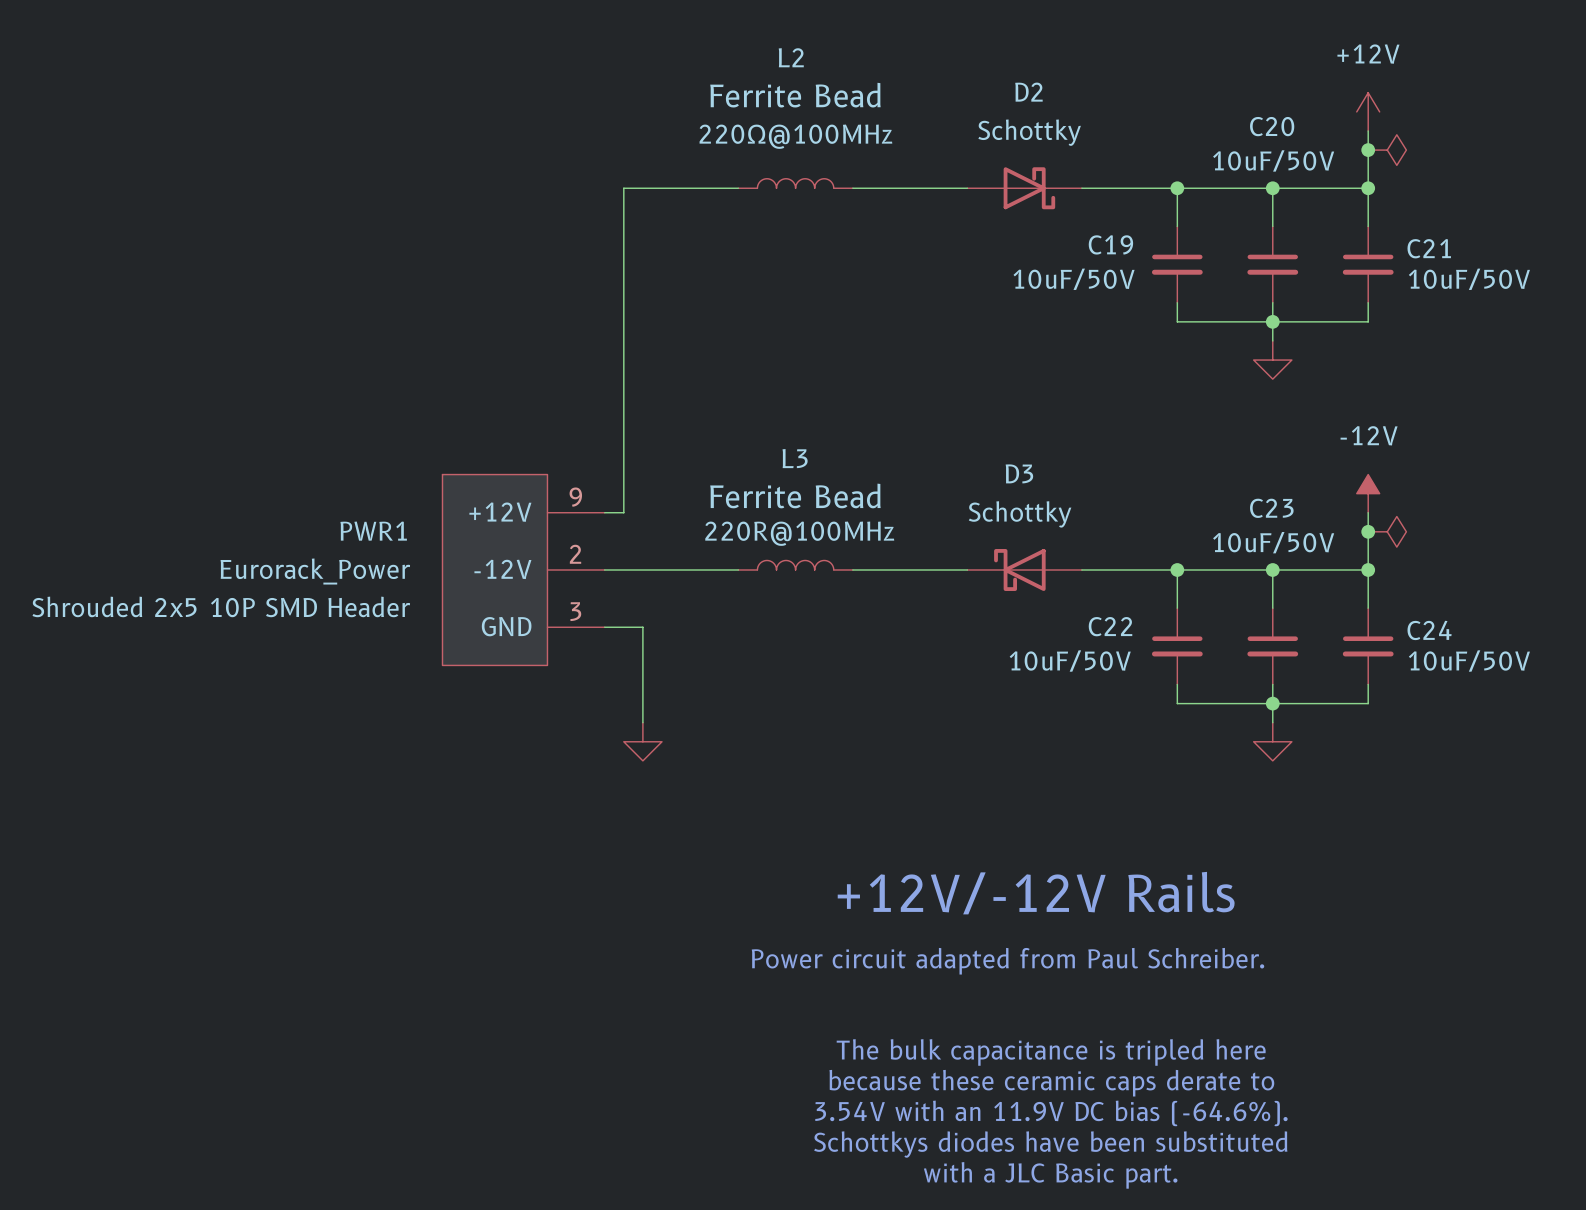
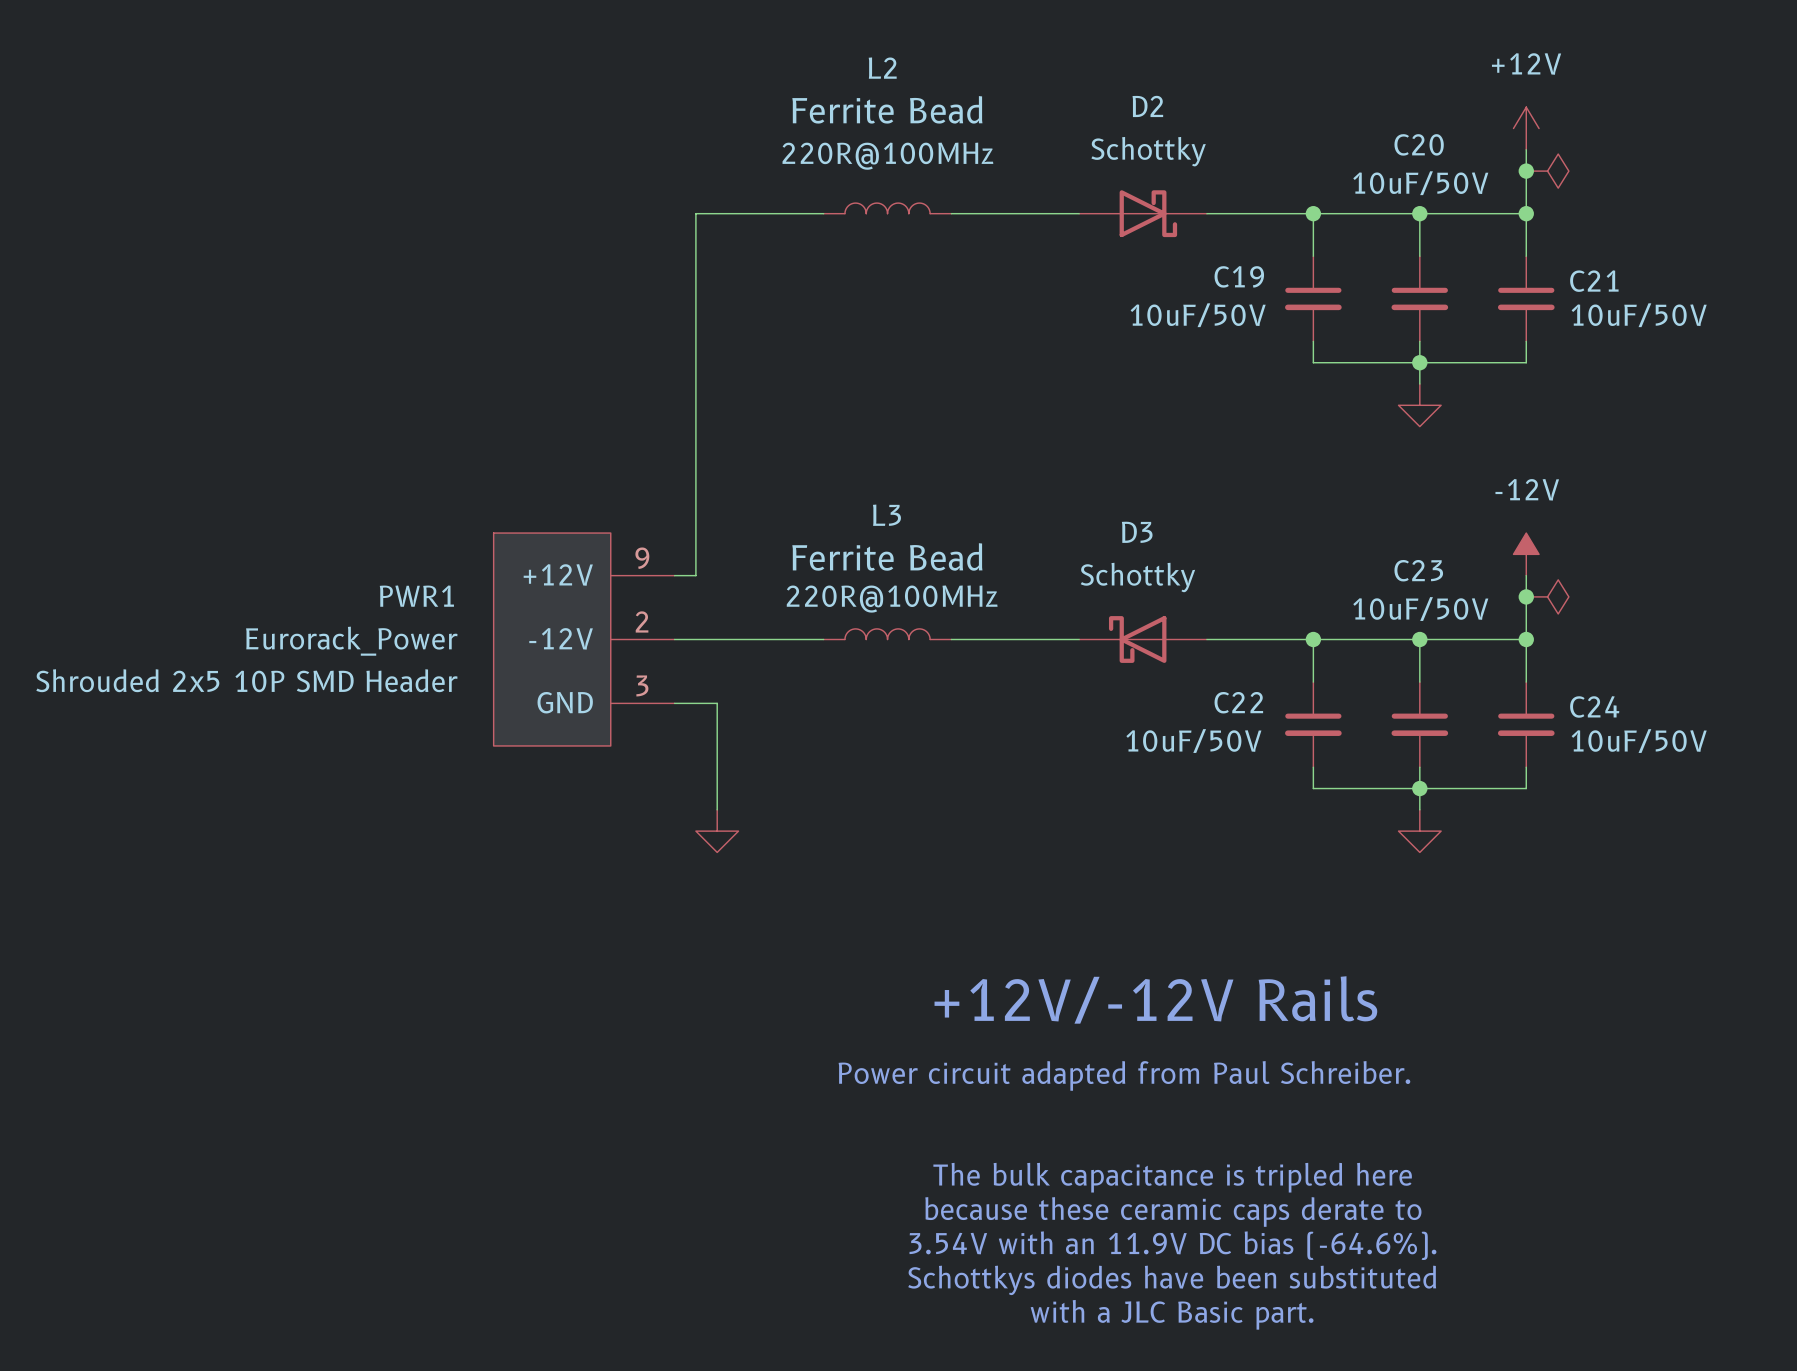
L2 value: 220Ω@100MHz (795, 136) -> 220R@100MHz (887, 156)

